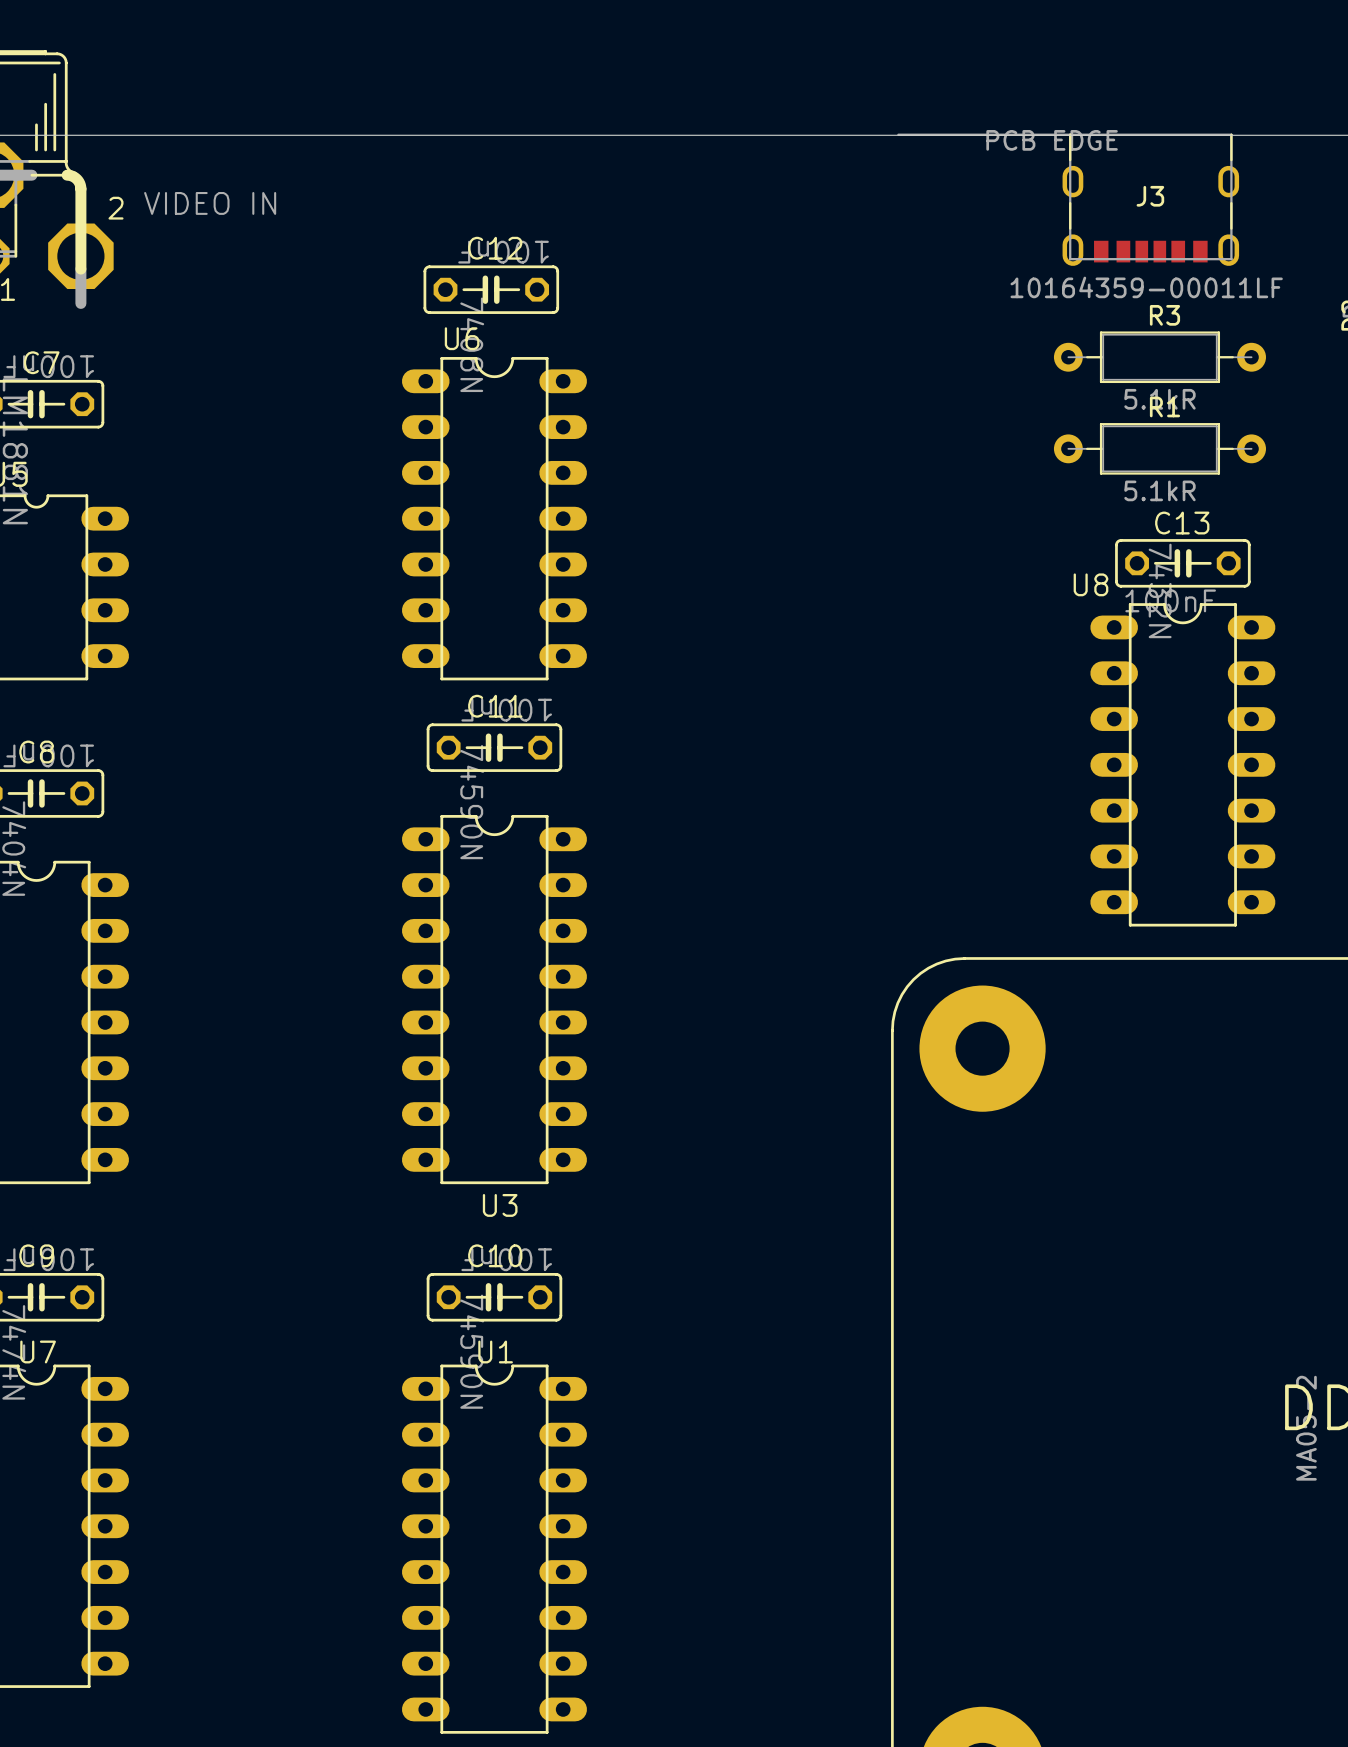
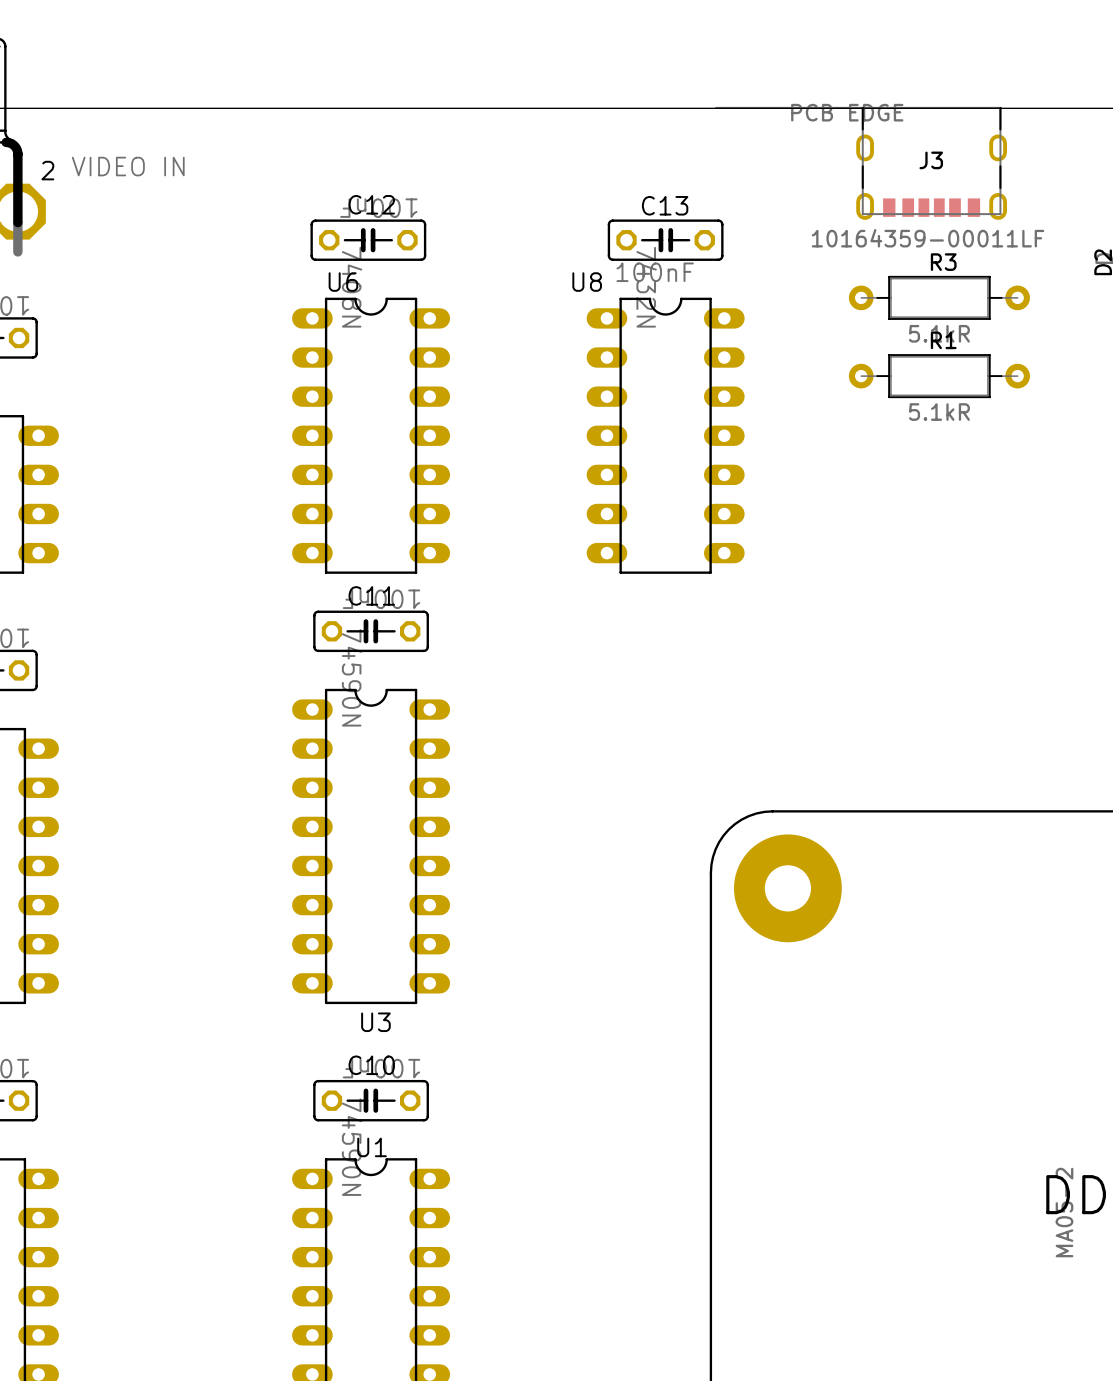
C13 position: (1182, 563) -> (665, 240)
U8 position: (1182, 764) -> (665, 435)

